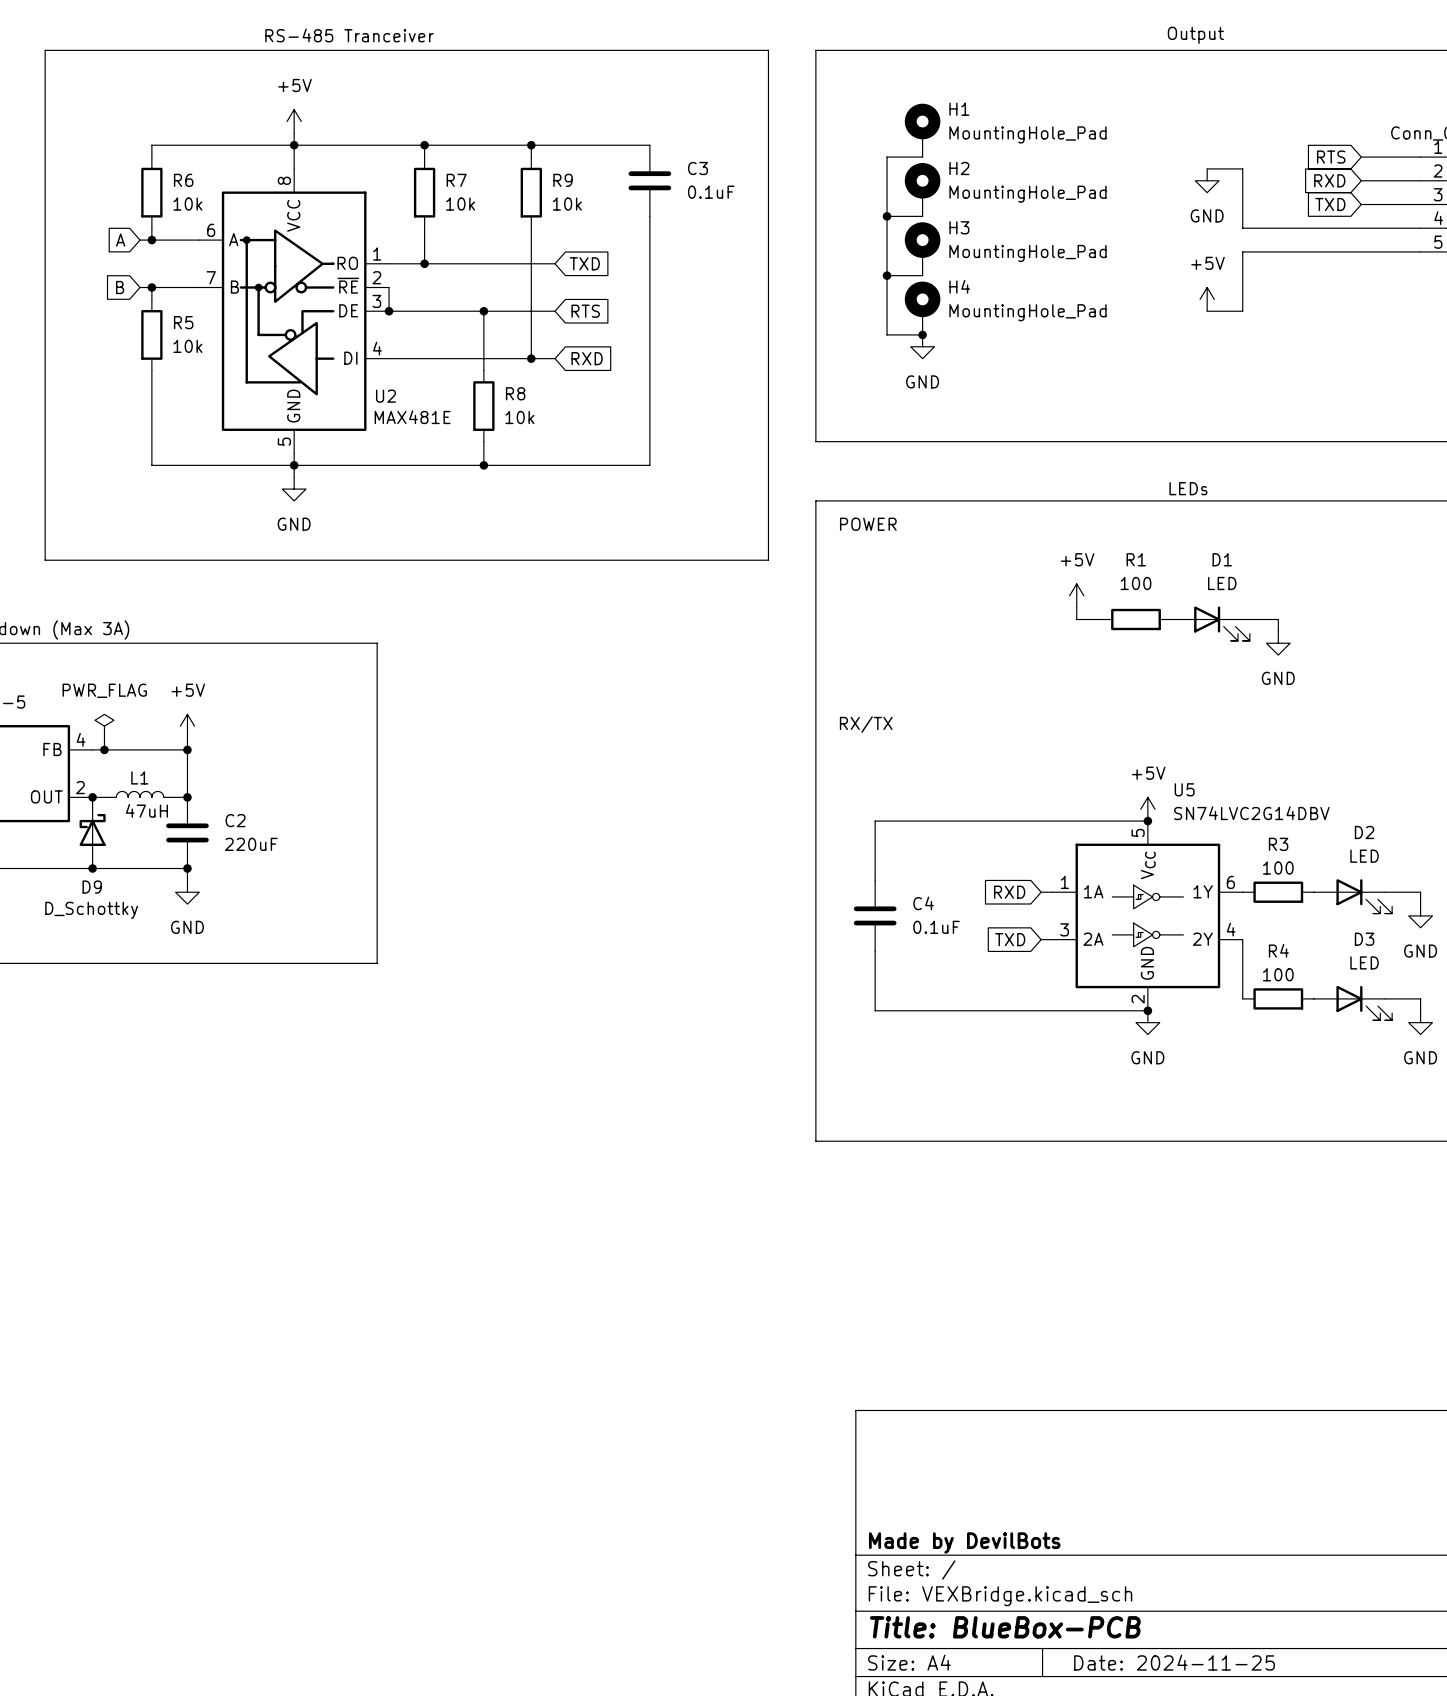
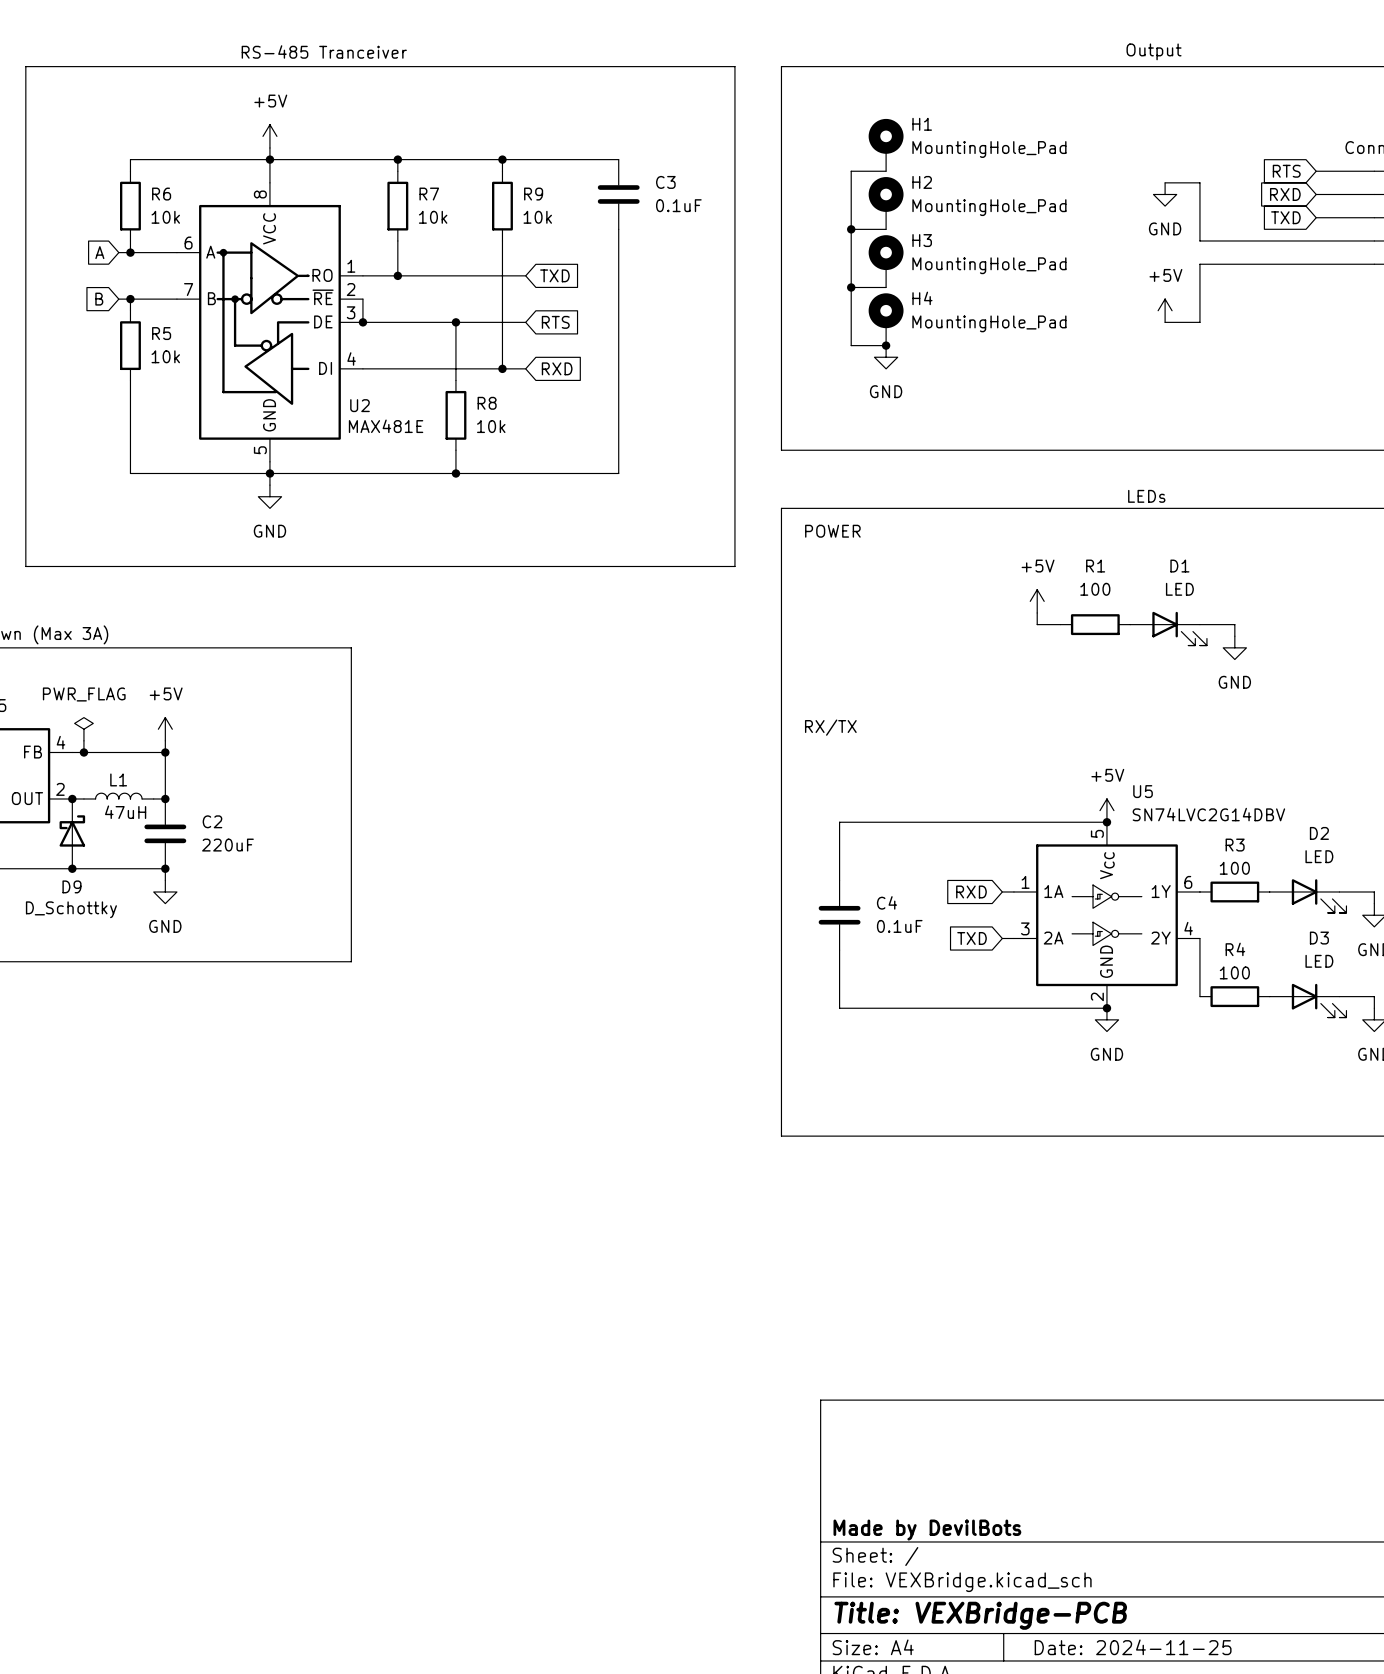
title block: Title: BlueBox-PCB (1005, 1627) -> Title: VEXBridge-PCB (980, 1615)

